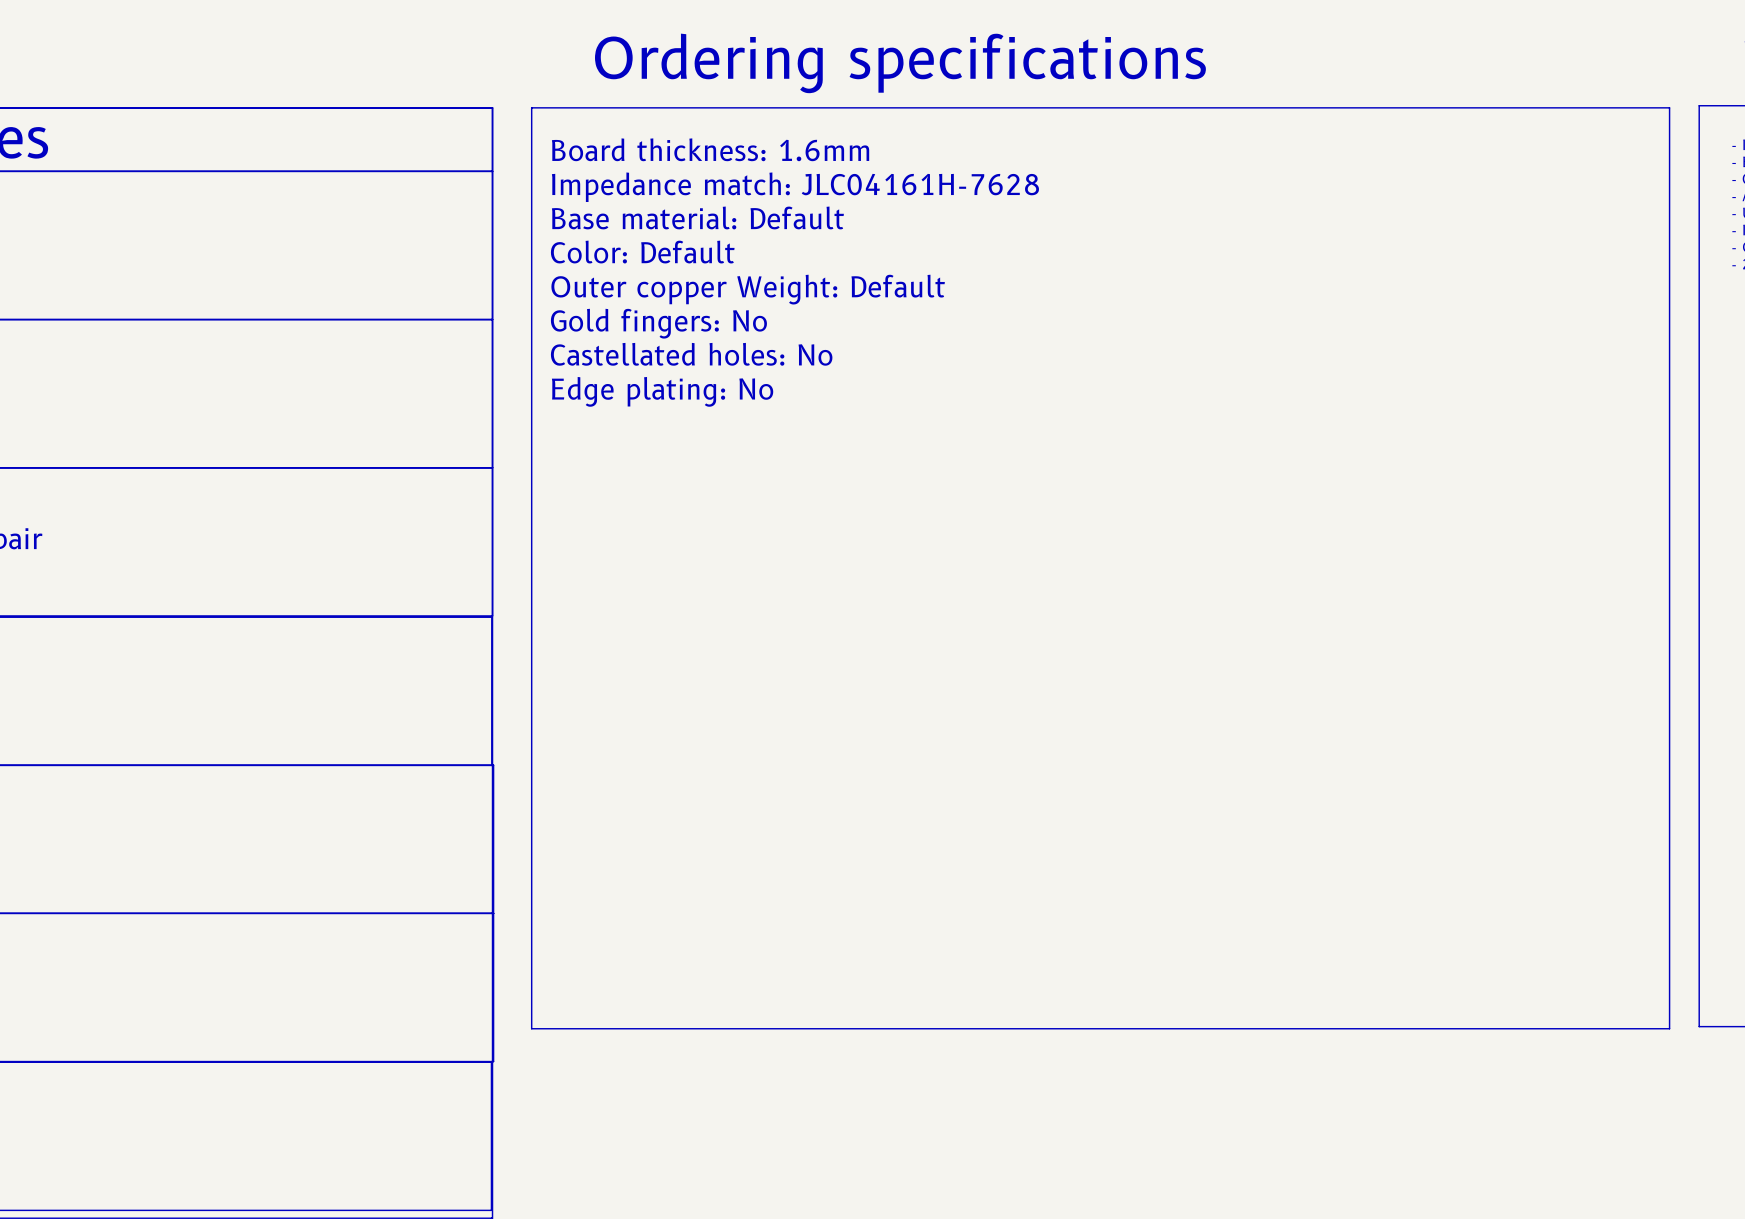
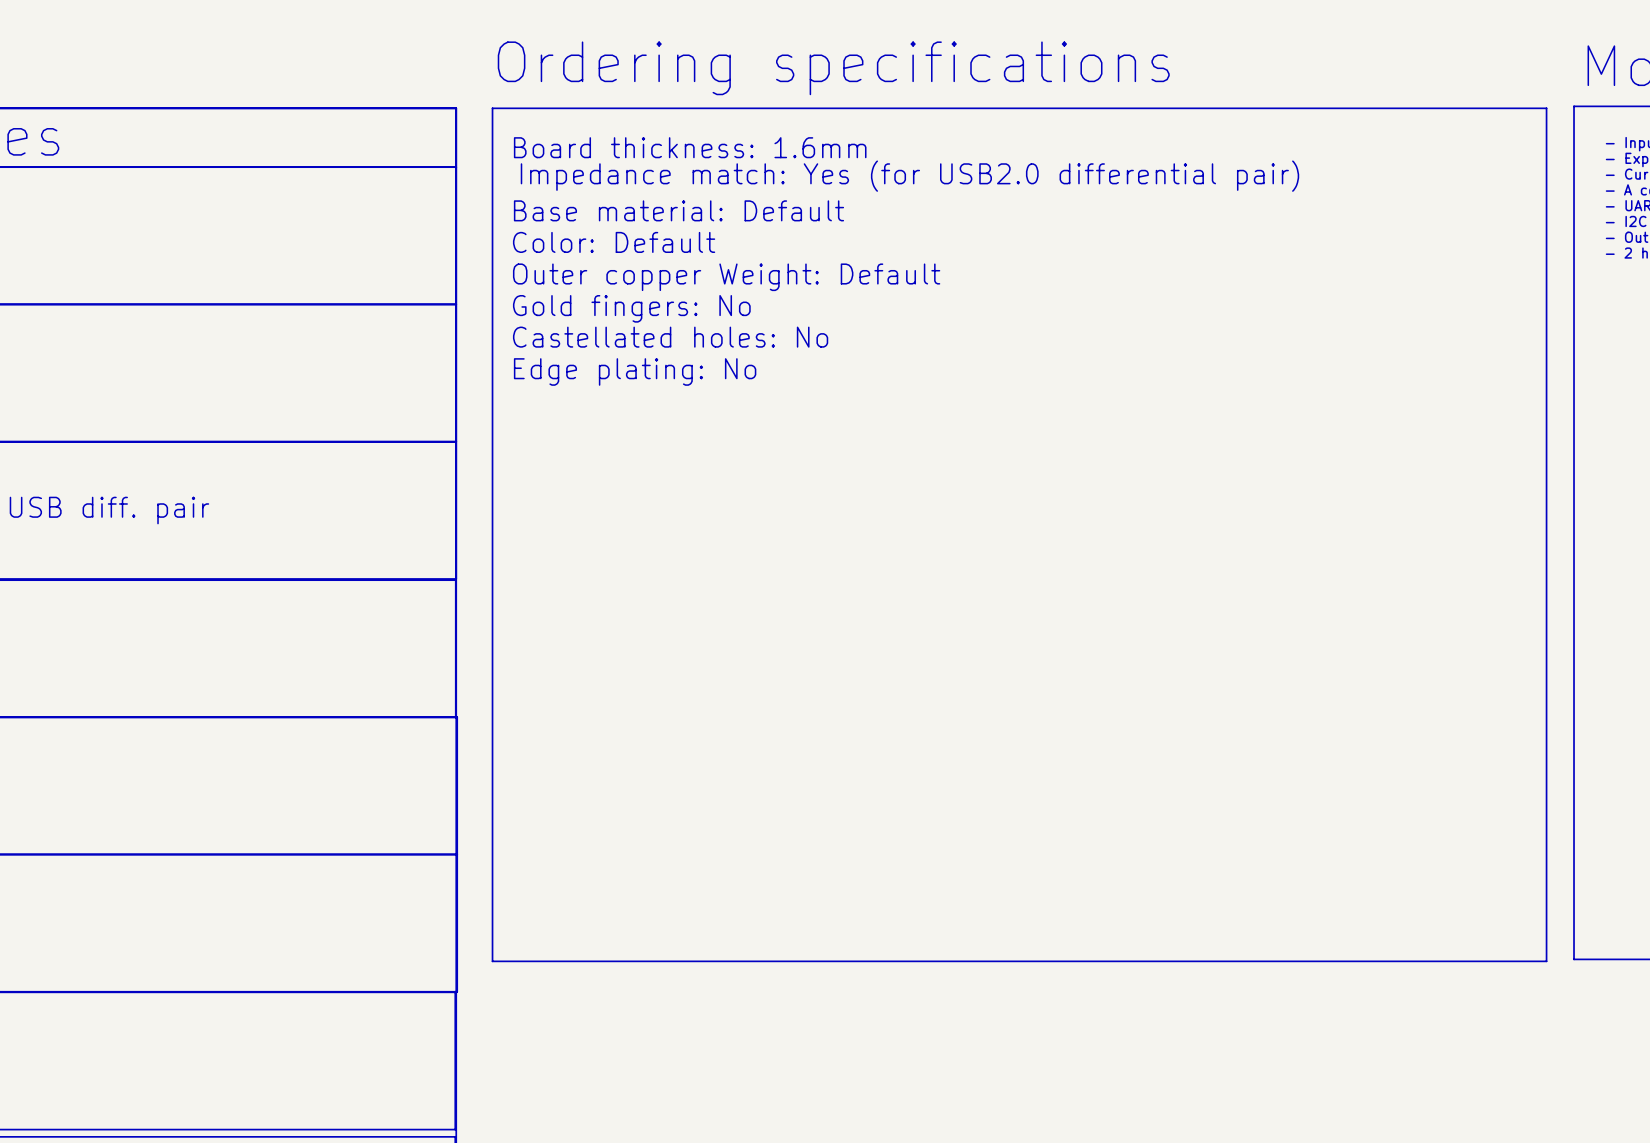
text: none -> Impedance match: Yes (for USB2.0 differential pair) (909, 176)
text: Impedance match: JLC04161H-7628 (795, 187) -> none

